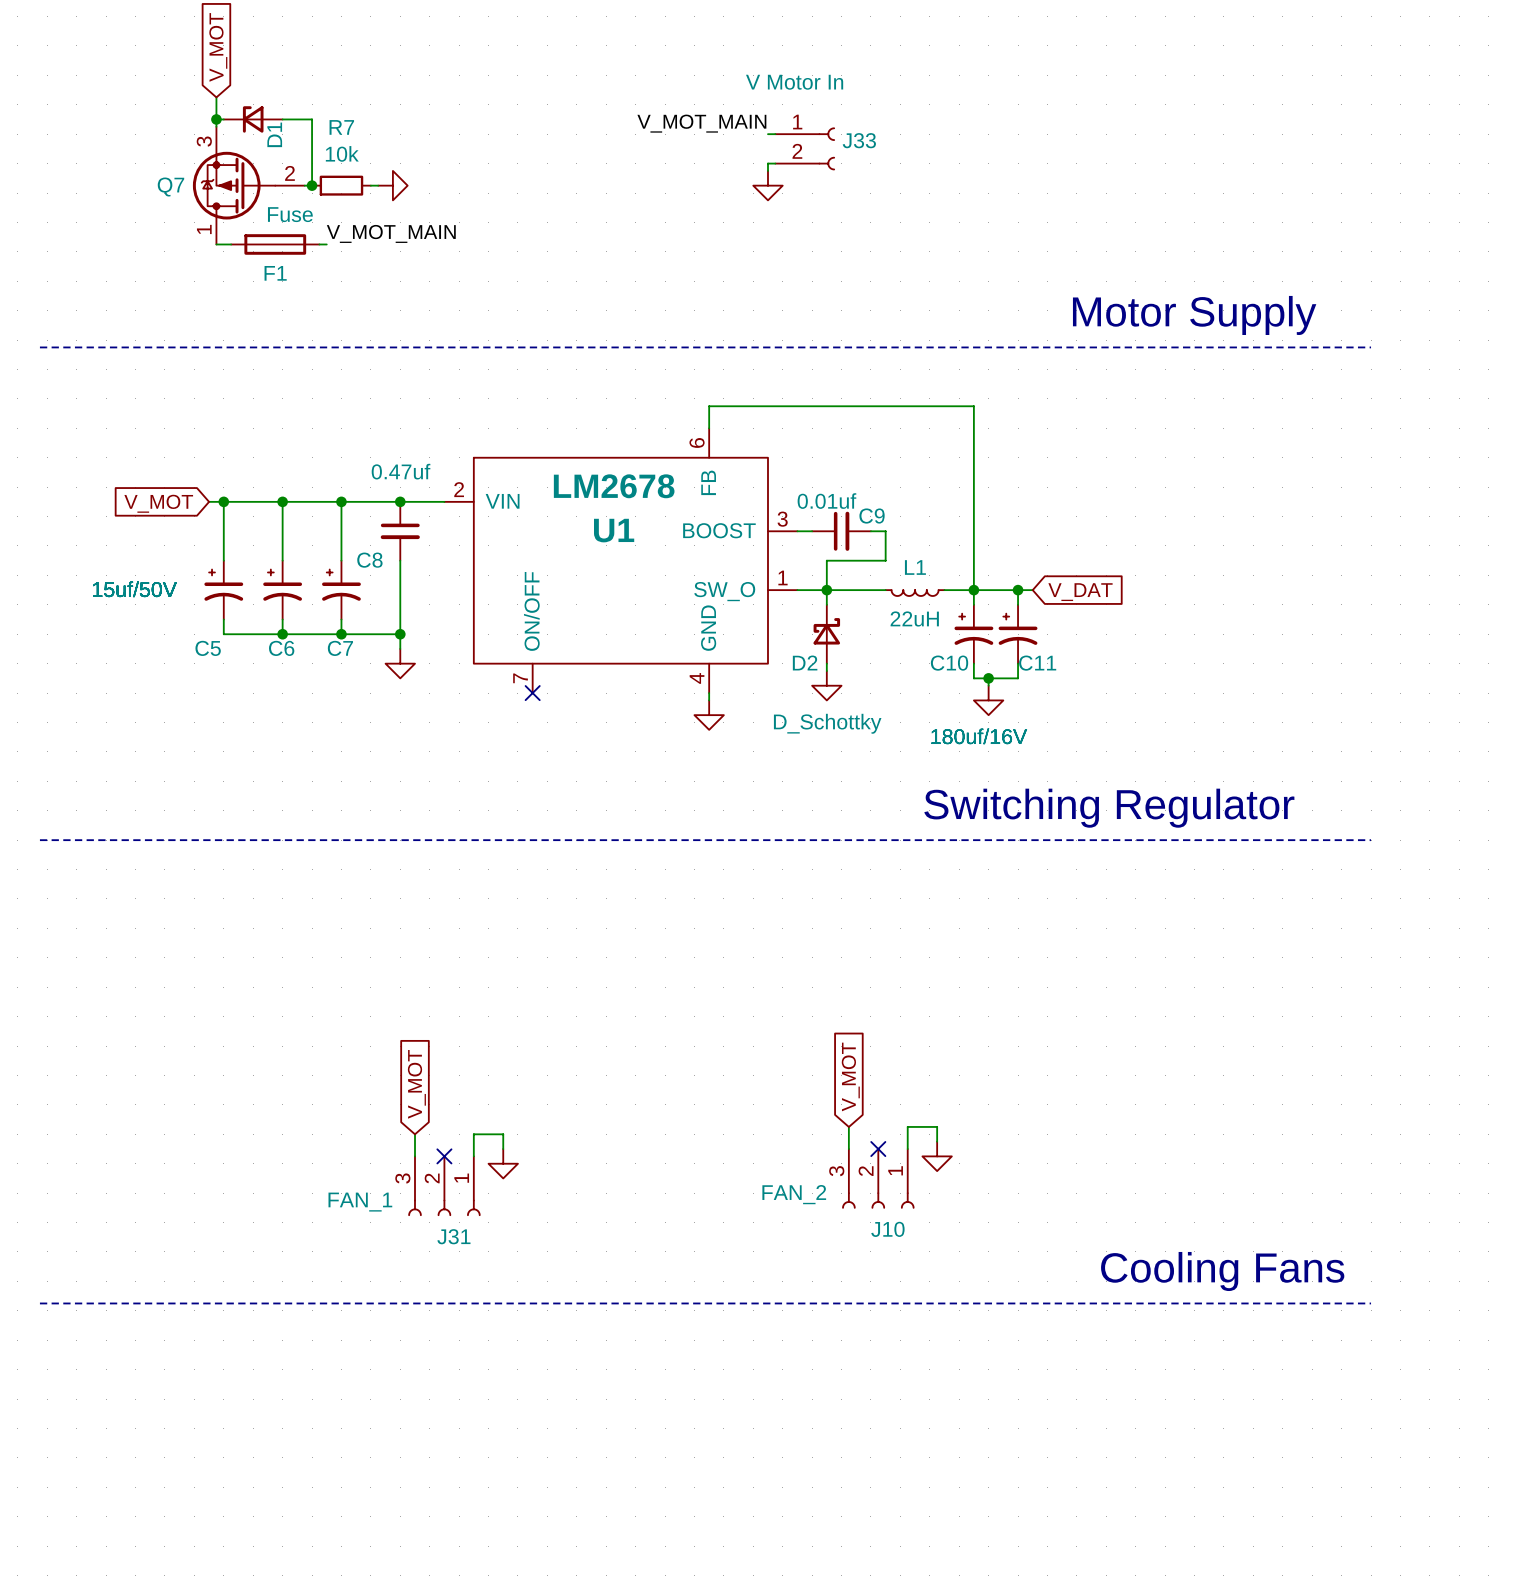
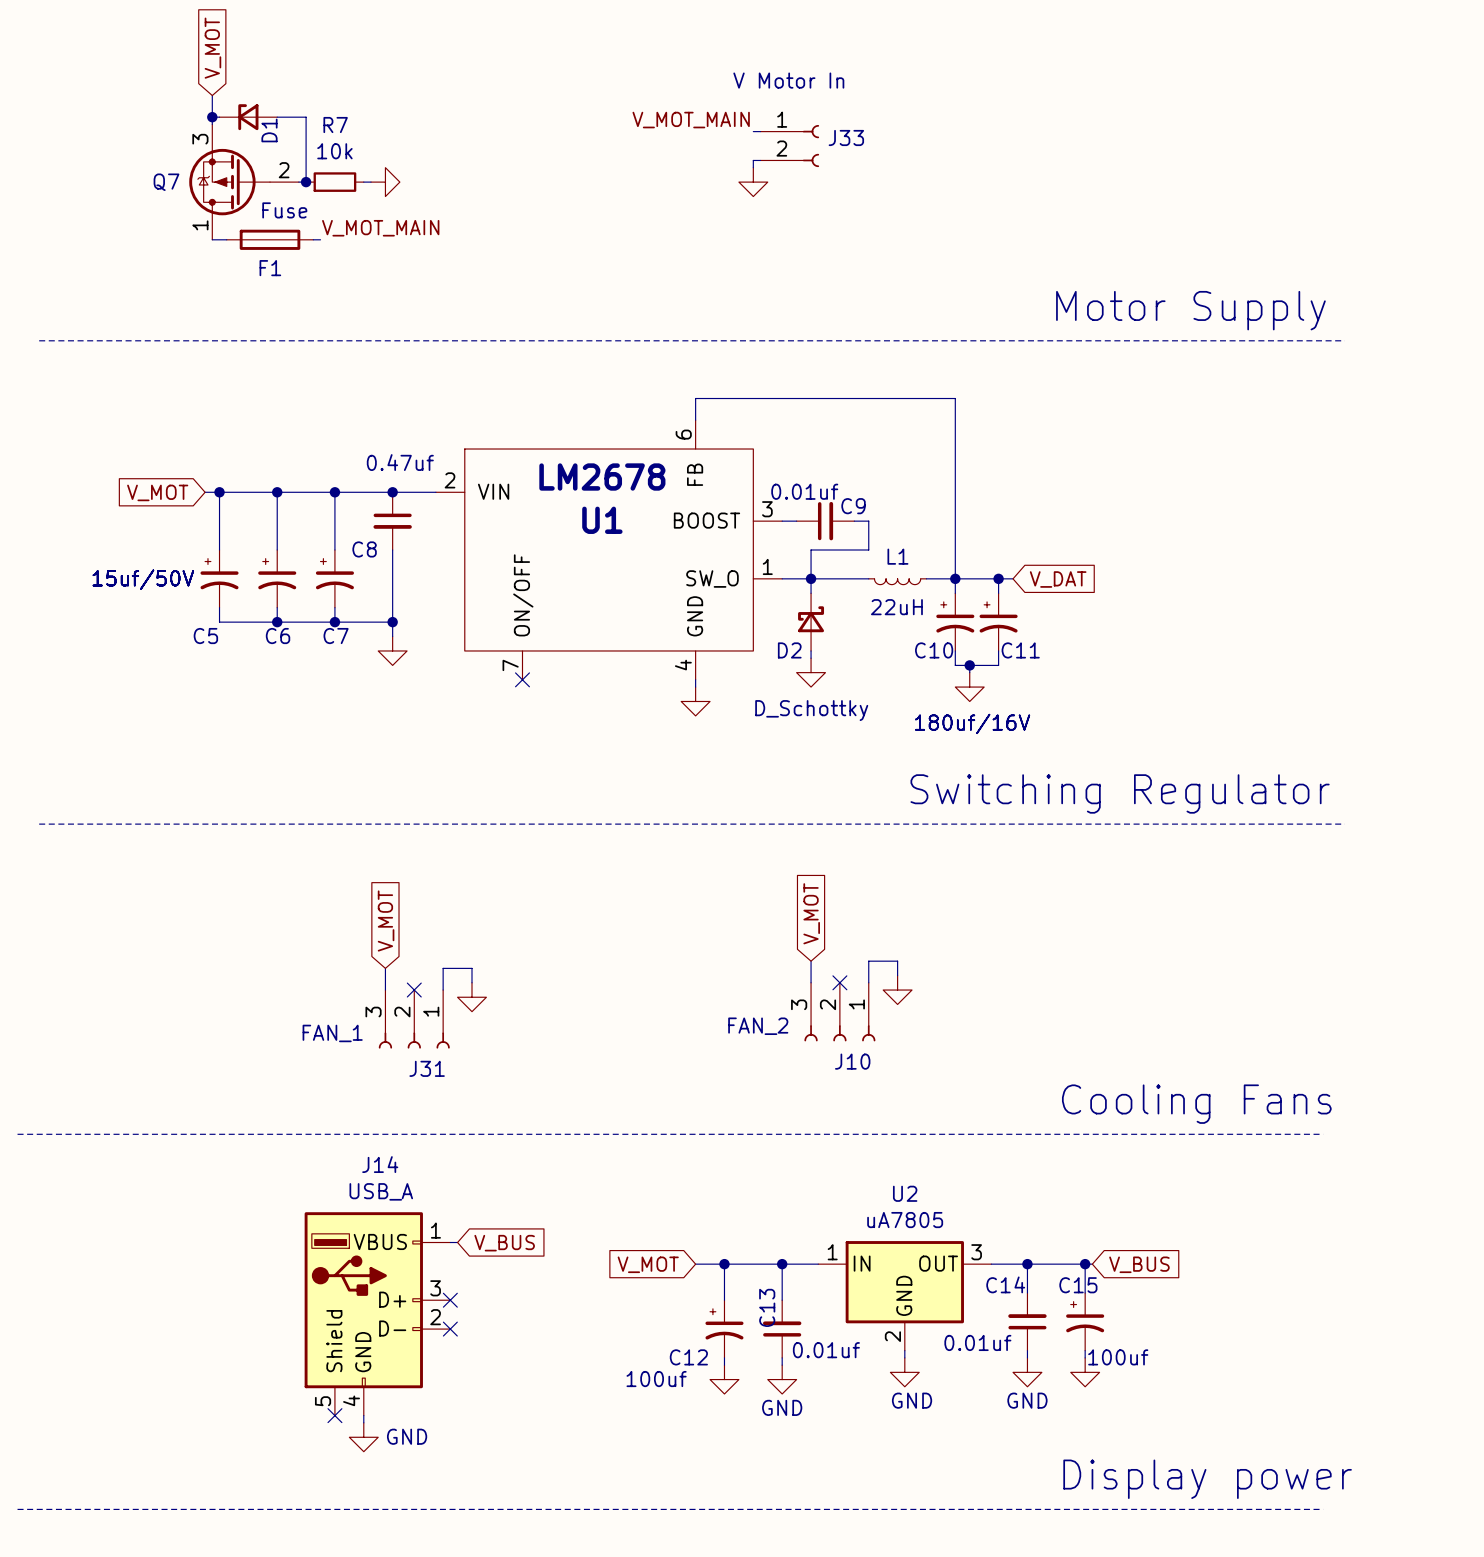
global label: none -> V_MOT (811, 913)
no-connect mark: none -> (839, 982)
no-connect mark: none -> (414, 990)
power symbol: none -> (897, 990)
global label: V_MOT (850, 1076) -> none
global label position: V_MOT (416, 1084) -> V_MOT (386, 920)
wire: (848, 1126) (848, 1149) -> (811, 961) (811, 982)
wire: (415, 1134) (415, 1156) -> (385, 968) (385, 990)
wire: (937, 1141) (937, 1126) (907, 1126) (907, 1149) -> (897, 975) (897, 961) (868, 961) (868, 982)
wire: (503, 1149) (503, 1134) (473, 1134) (473, 1156) -> (472, 982) (472, 968) (443, 968) (443, 990)
no-connect mark: (878, 1149) -> none
no-connect mark: (444, 1156) -> none
power symbol: (937, 1156) -> none
power symbol position: (503, 1163) -> (472, 997)
J10 position: (878, 1178) -> (839, 1012)
J31 position: (444, 1186) -> (414, 1019)
wire: none -> (450, 1242) (457, 1242)
global label: none -> V_BUS (504, 1243)
text position: Cooling Fans (1222, 1271) -> Cooling Fans (1196, 1104)
wire: none -> (695, 1264) (818, 1264)
wire: none -> (724, 1264) (724, 1300)
junction: none -> (724, 1264)
wire: none -> (782, 1264) (782, 1300)
junction: none -> (782, 1264)
wire: none -> (991, 1264) (1092, 1264)
wire: none -> (1027, 1264) (1027, 1293)
junction: none -> (1027, 1264)
wire: none -> (1085, 1264) (1085, 1293)
junction: none -> (1085, 1264)
global label: none -> V_MOT (648, 1264)
global label: none -> V_BUS (1139, 1264)
line: (39, 1303) (1371, 1303) -> (17, 1134) (1323, 1134)
U2: none -> uA7805 (904, 1295)
no-connect mark: none -> (450, 1300)
J14: none -> USB_A (377, 1313)
C14: none -> 0.01uf (1027, 1321)
C15: none -> 100uf (1085, 1321)
no-connect mark: none -> (450, 1329)
C12: none -> 100uf (724, 1329)
C13: none -> 0.01uf (782, 1329)
wire: none -> (904, 1350) (904, 1357)
wire: none -> (1027, 1350) (1027, 1357)
wire: none -> (1085, 1350) (1085, 1357)
wire: none -> (724, 1357) (724, 1365)
wire: none -> (782, 1357) (782, 1365)
power symbol: none -> GND (904, 1372)
power symbol: none -> GND (1027, 1372)
power symbol: none -> (1085, 1372)
power symbol: none -> (724, 1379)
power symbol: none -> GND (782, 1379)
no-connect mark: none -> (334, 1415)
wire: none -> (363, 1415) (363, 1422)
power symbol: none -> GND (363, 1437)
text: none -> Display power (1207, 1479)
line: none -> (17, 1509) (1323, 1509)

